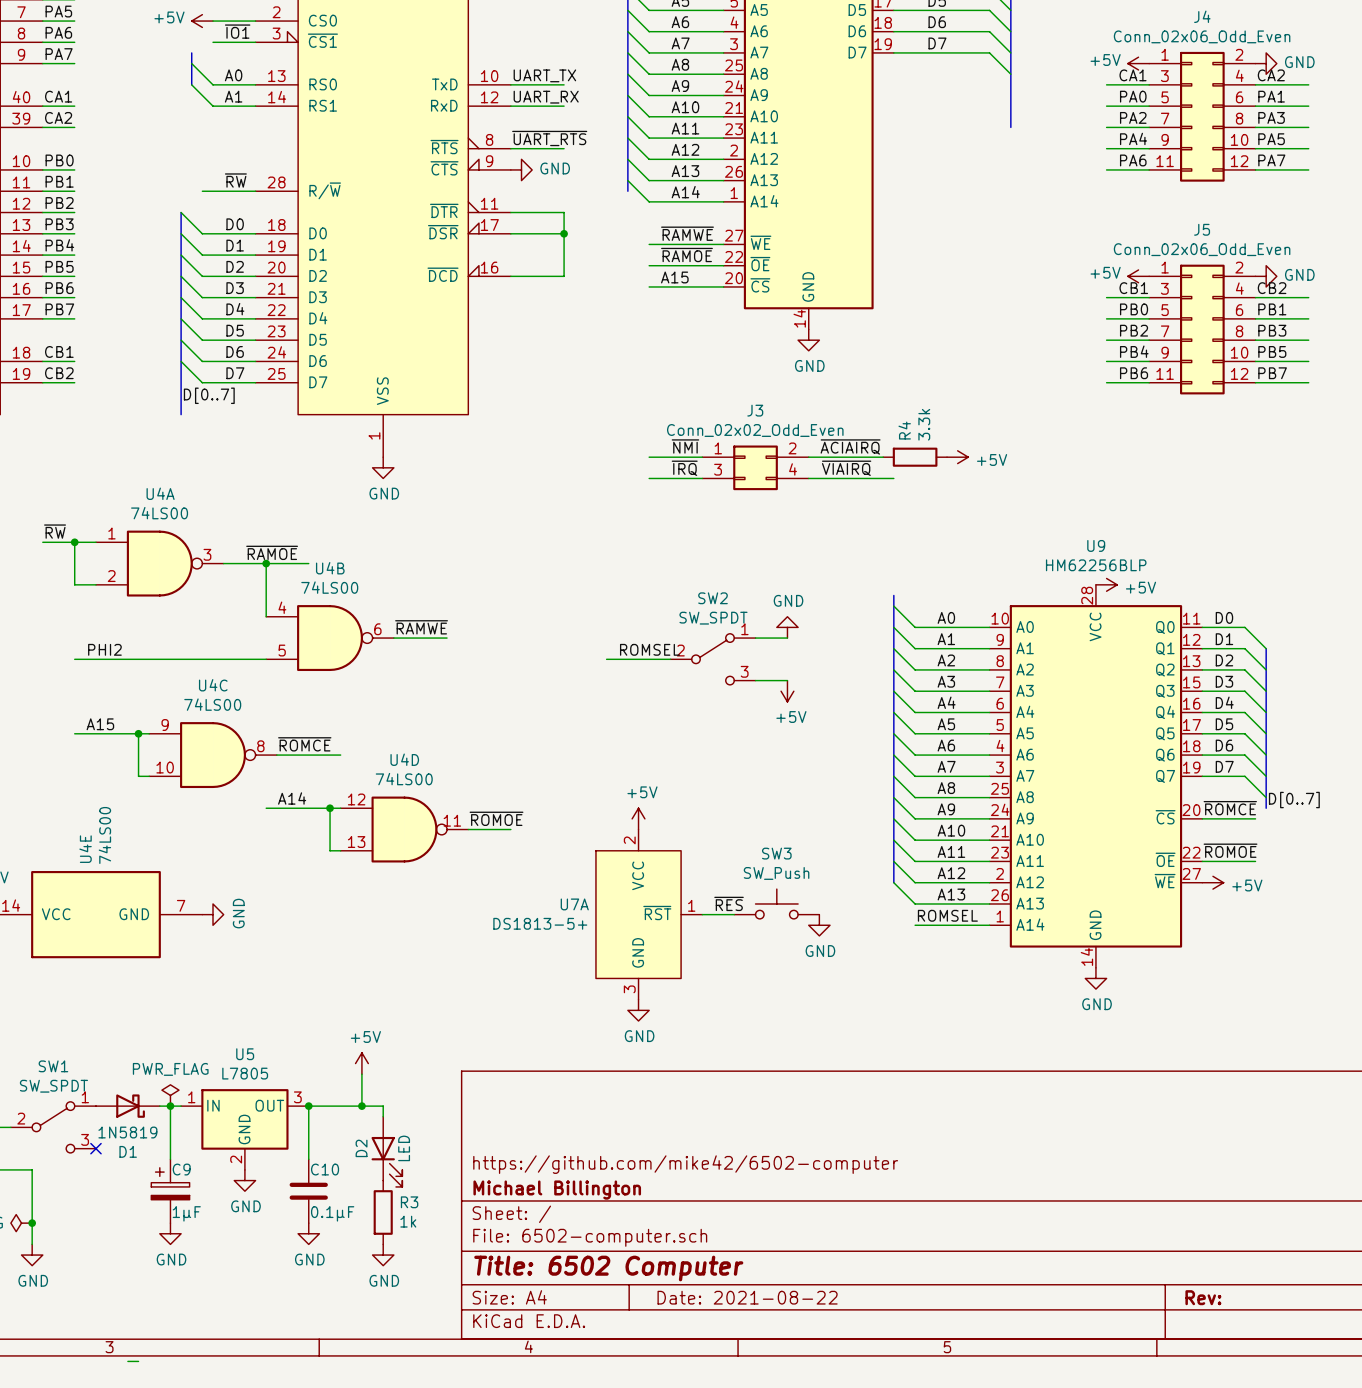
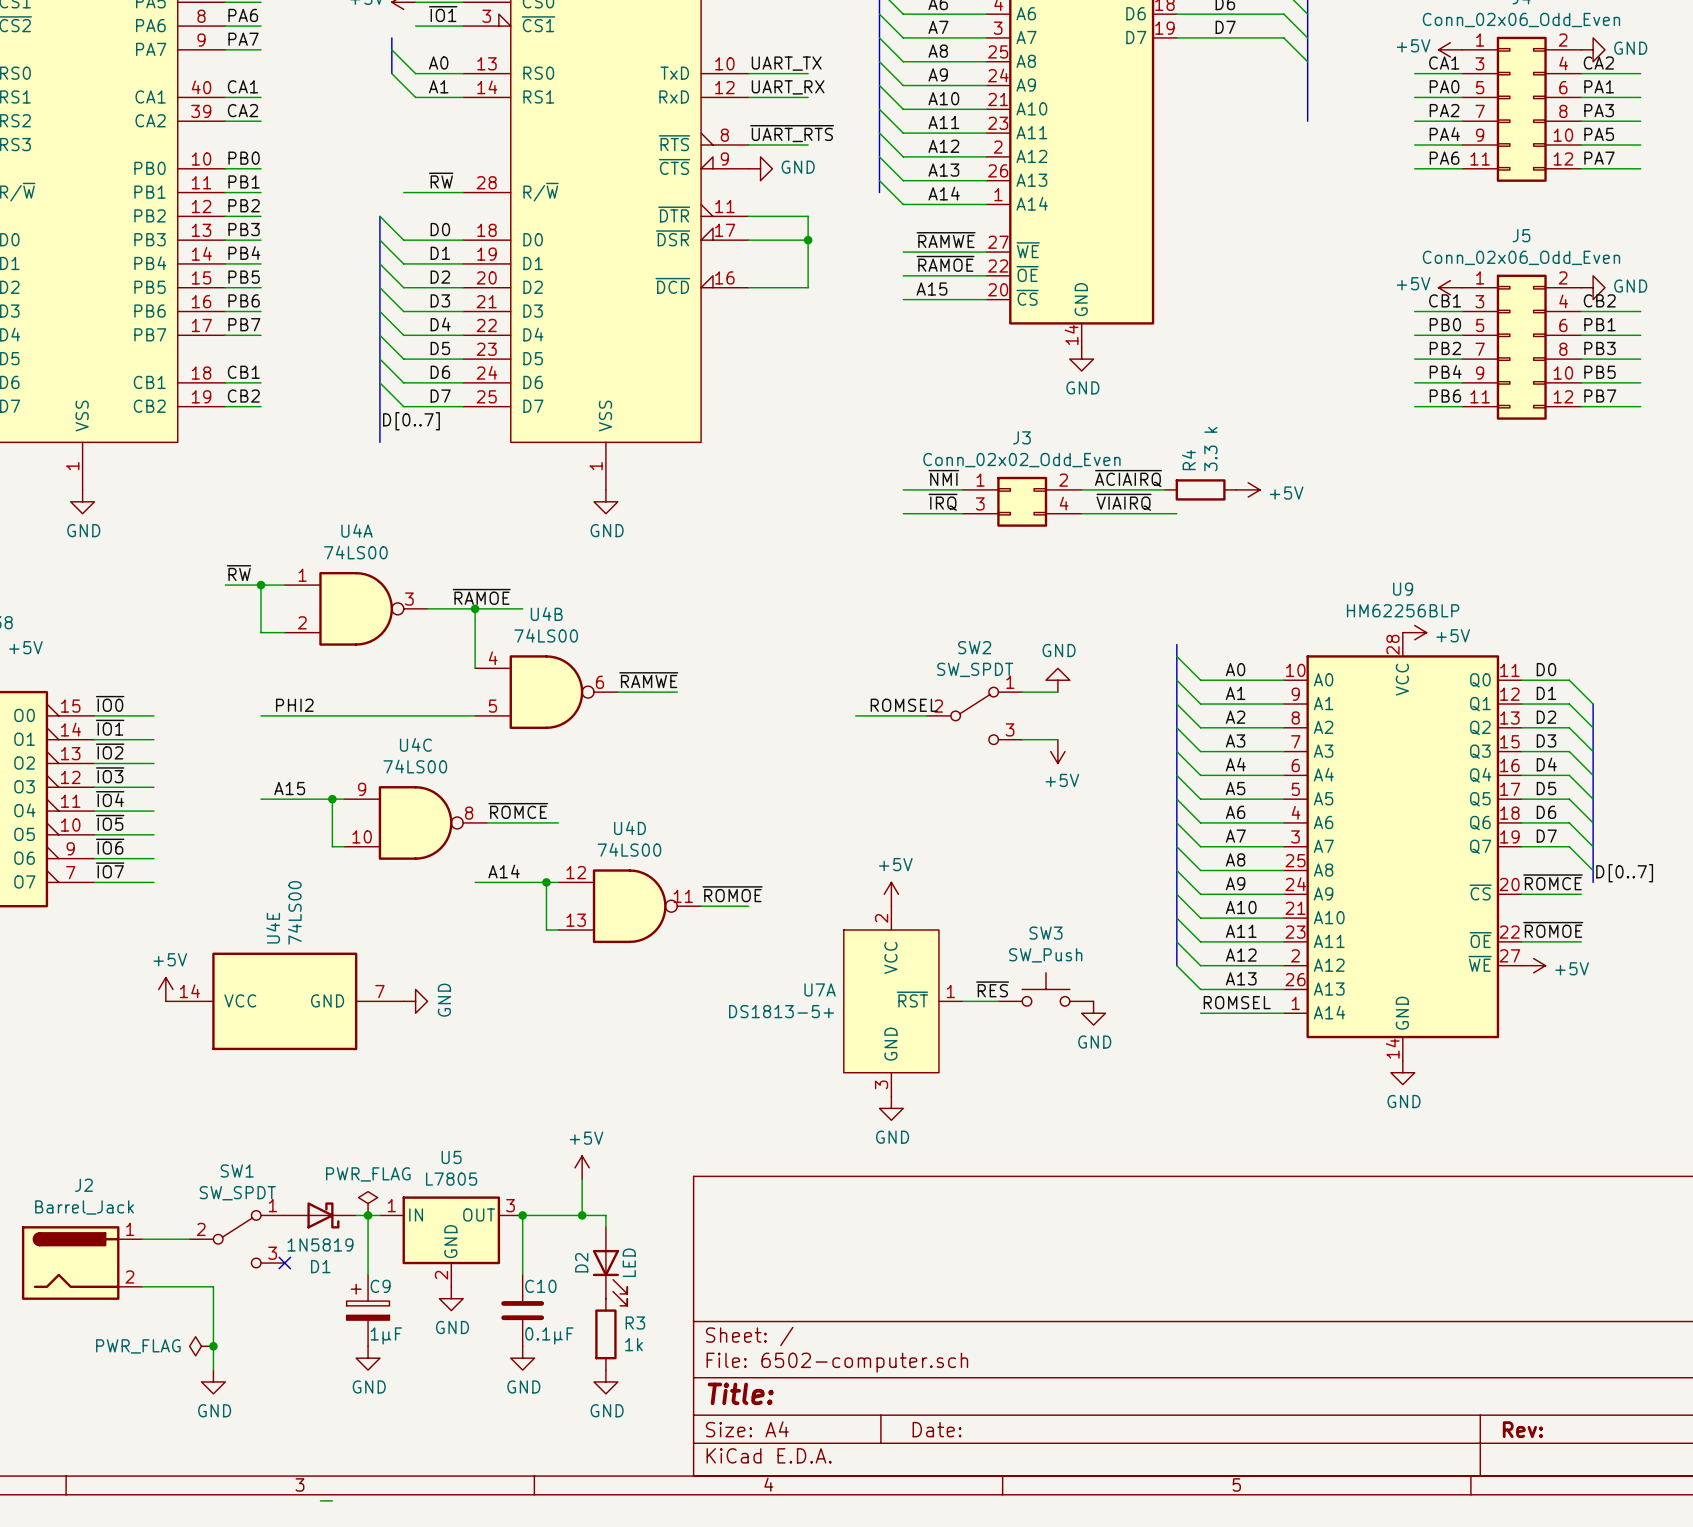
R4 value: 3.3k (924, 424) -> 3.3 k (1210, 449)
title block: https://github.com/mike42/6502-computer (685, 1164) -> none
title block: Michael Billington (557, 1190) -> none
title block: Title: 6502 Computer (608, 1268) -> Title: (740, 1393)
title block: Date: 2021-08-22 (747, 1297) -> Date: (937, 1429)

